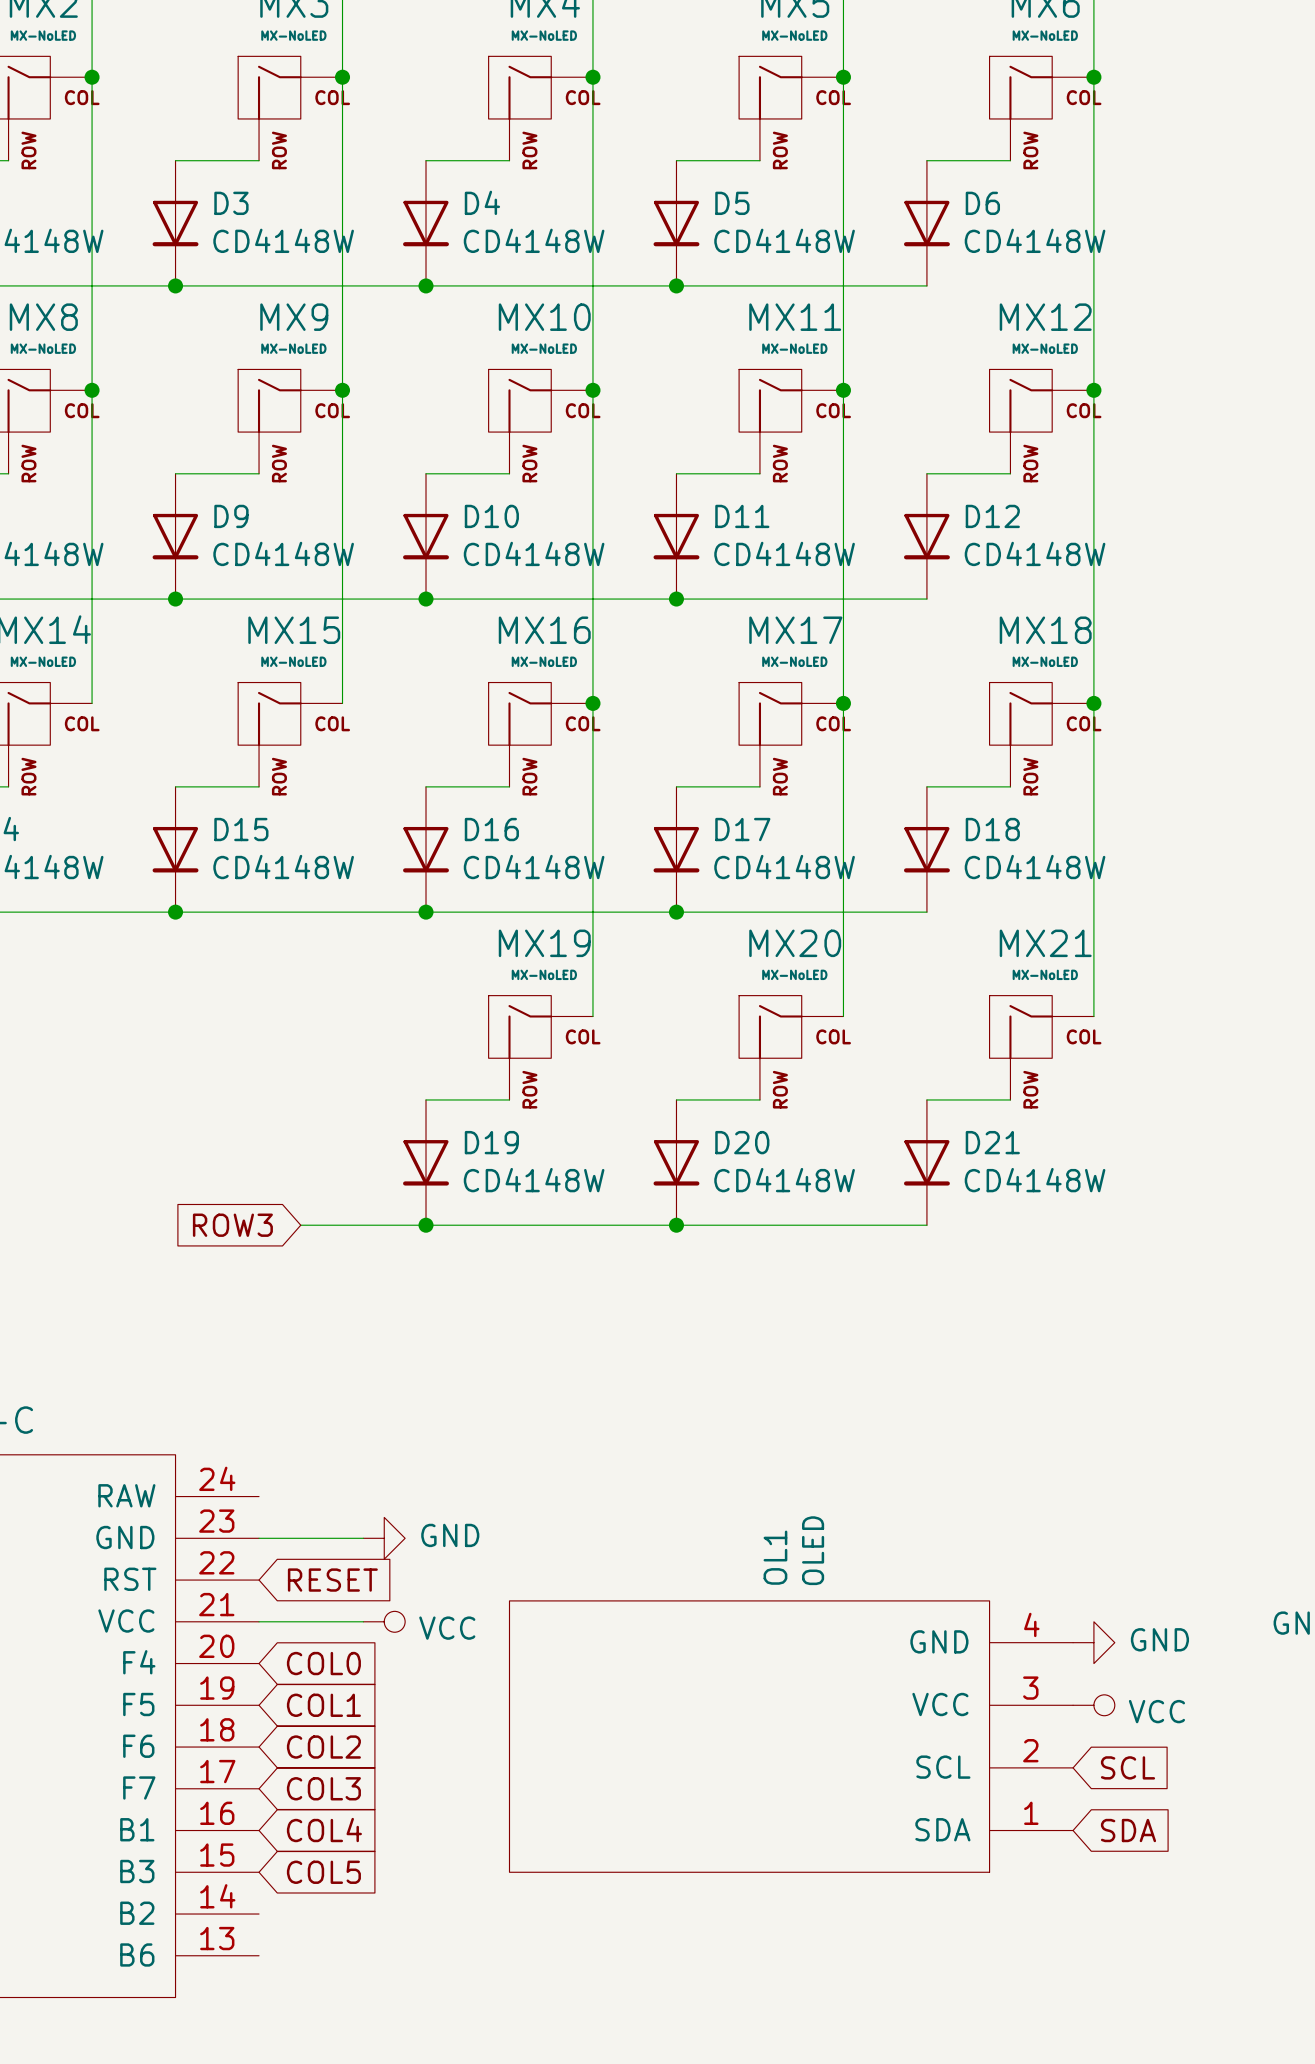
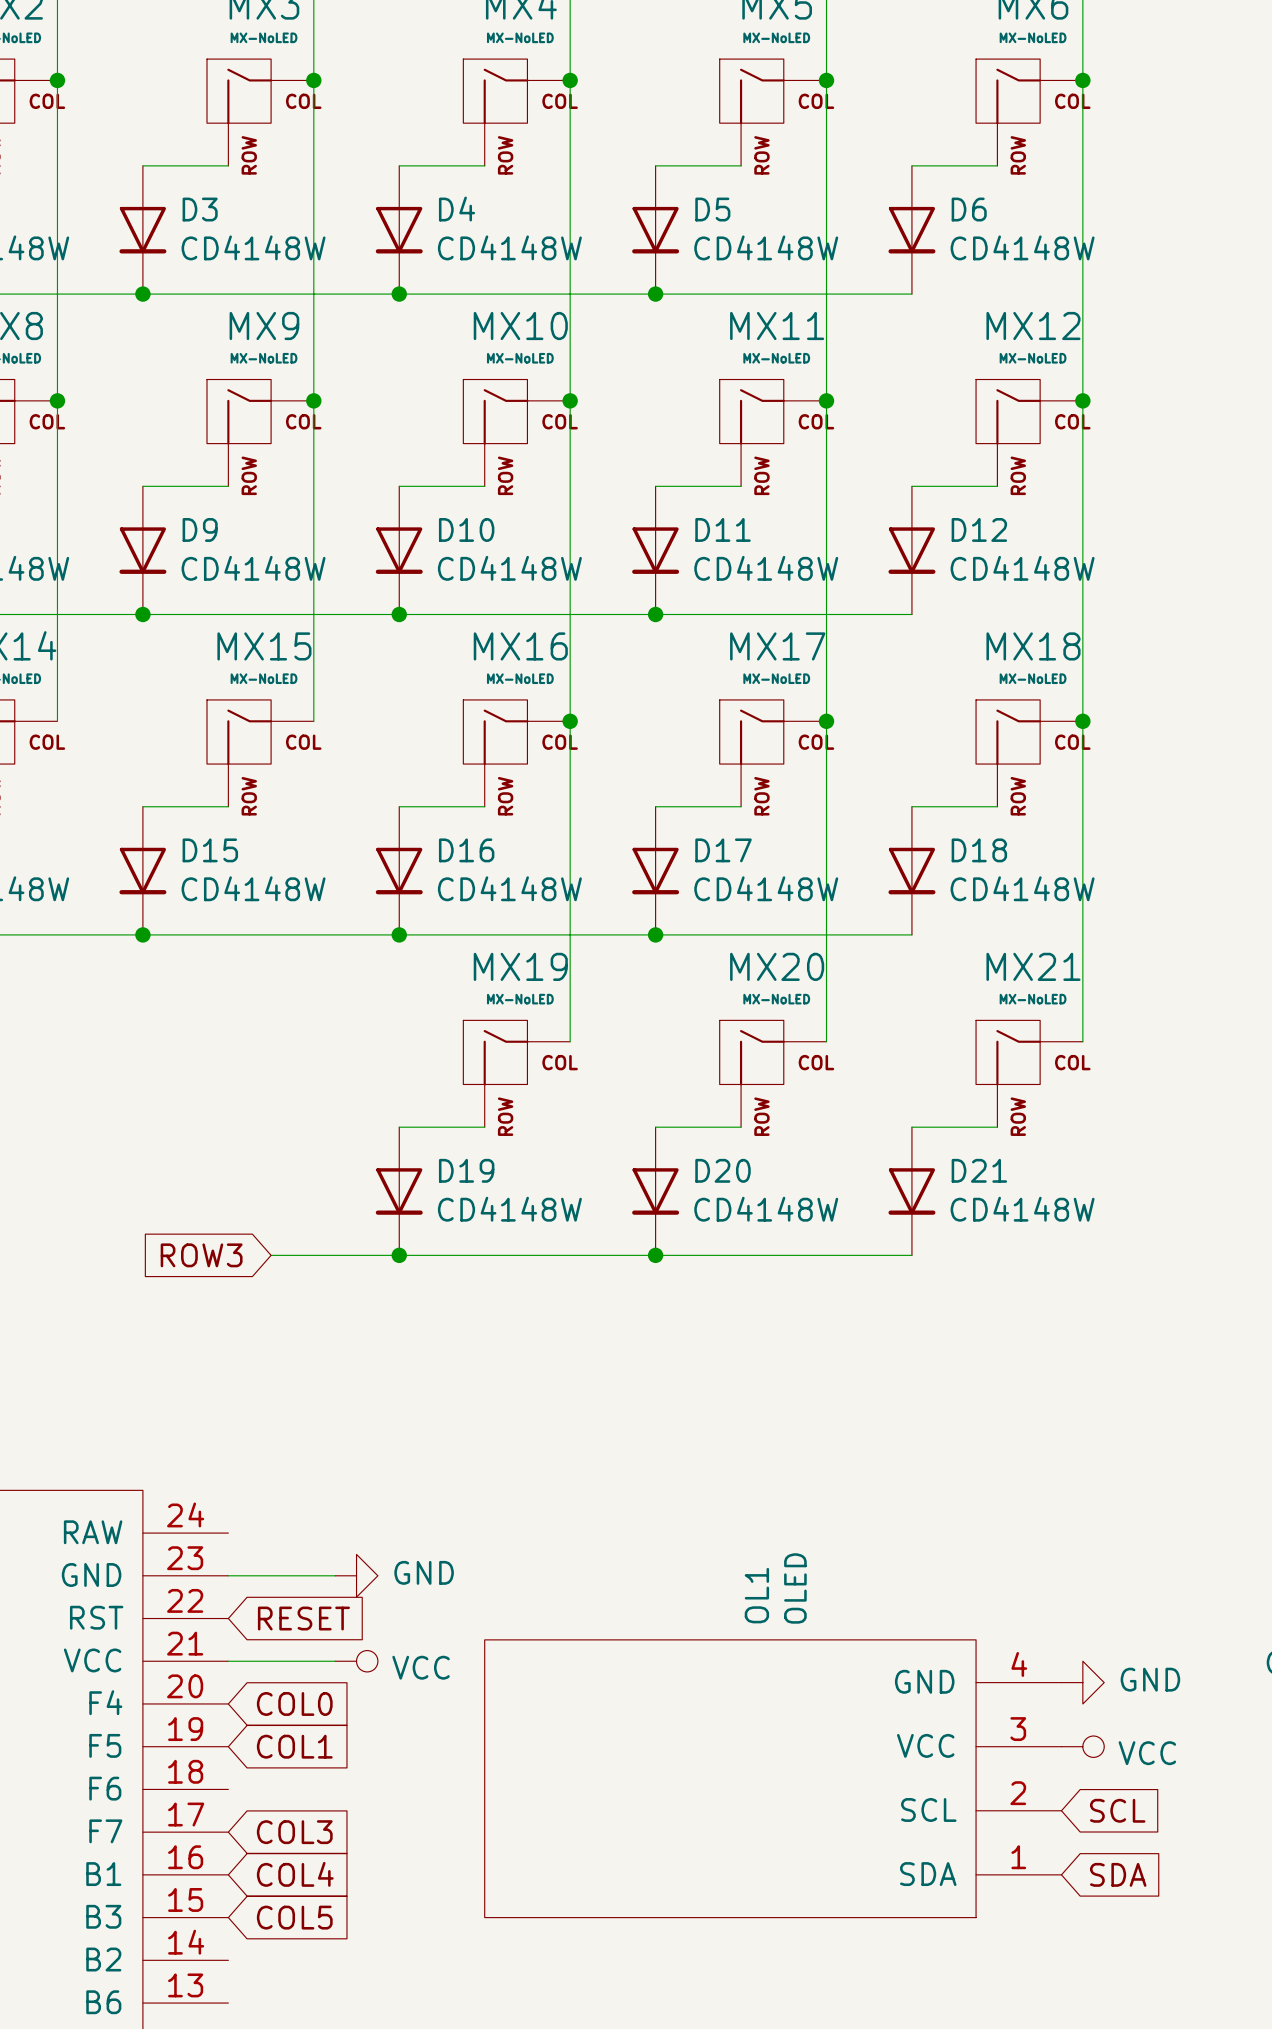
global label: COL2 (323, 1747) -> none

